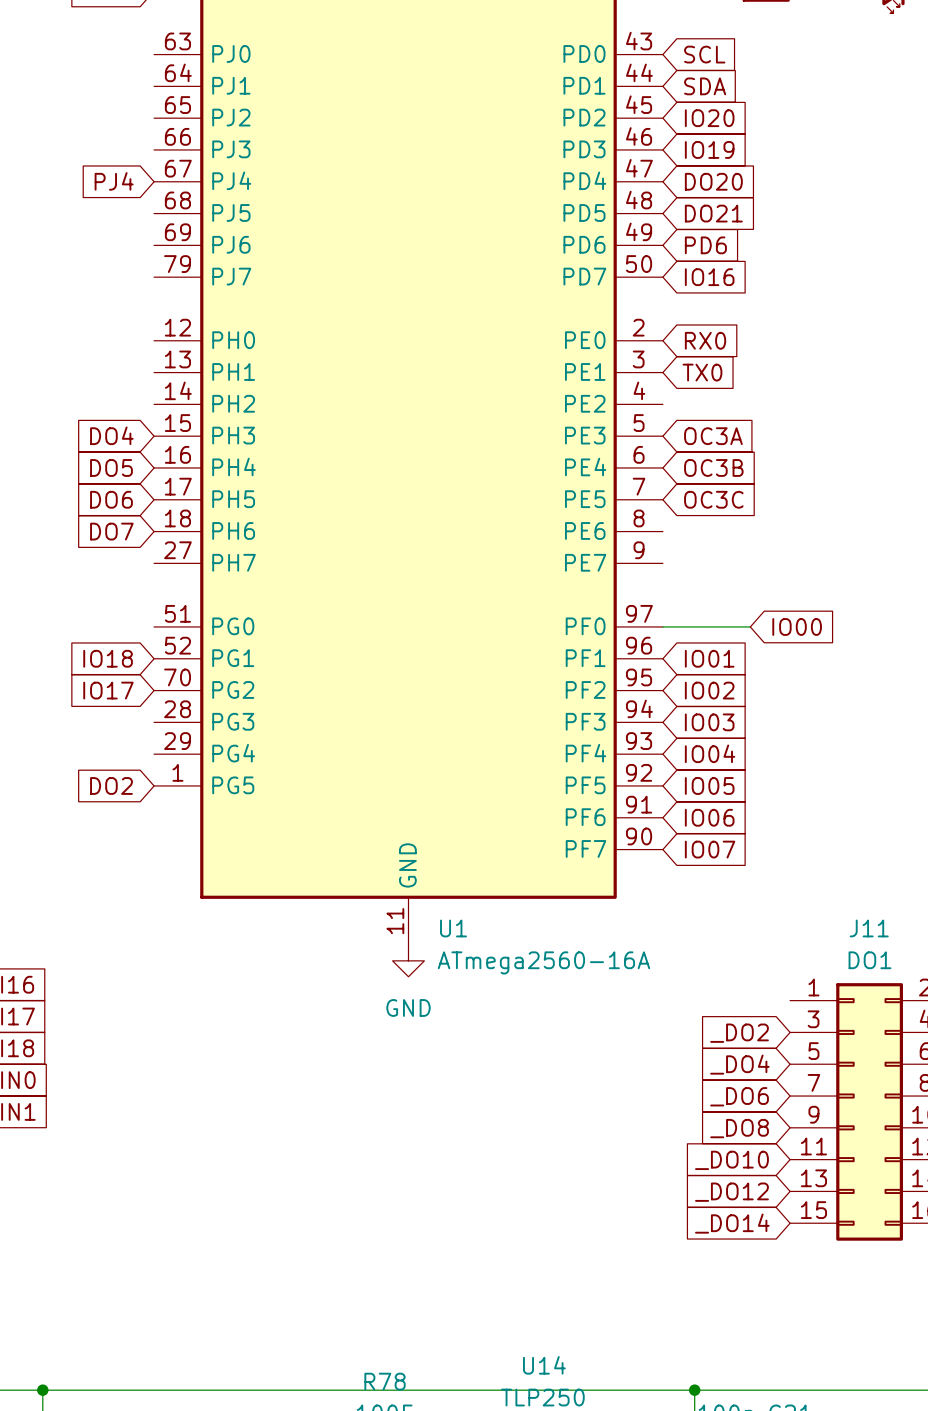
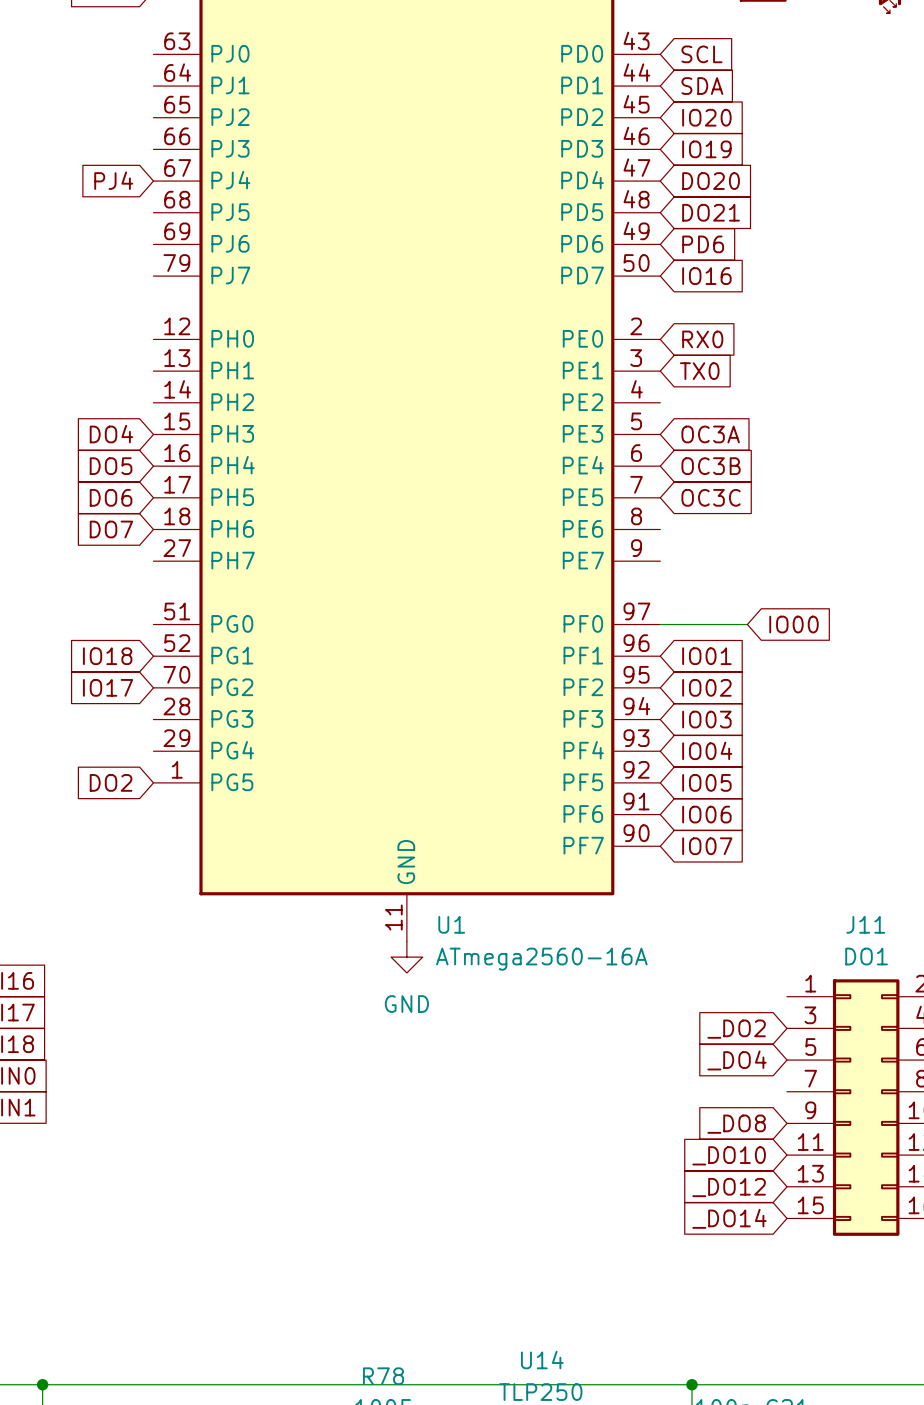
global label: _DO6 (739, 1096) -> none

